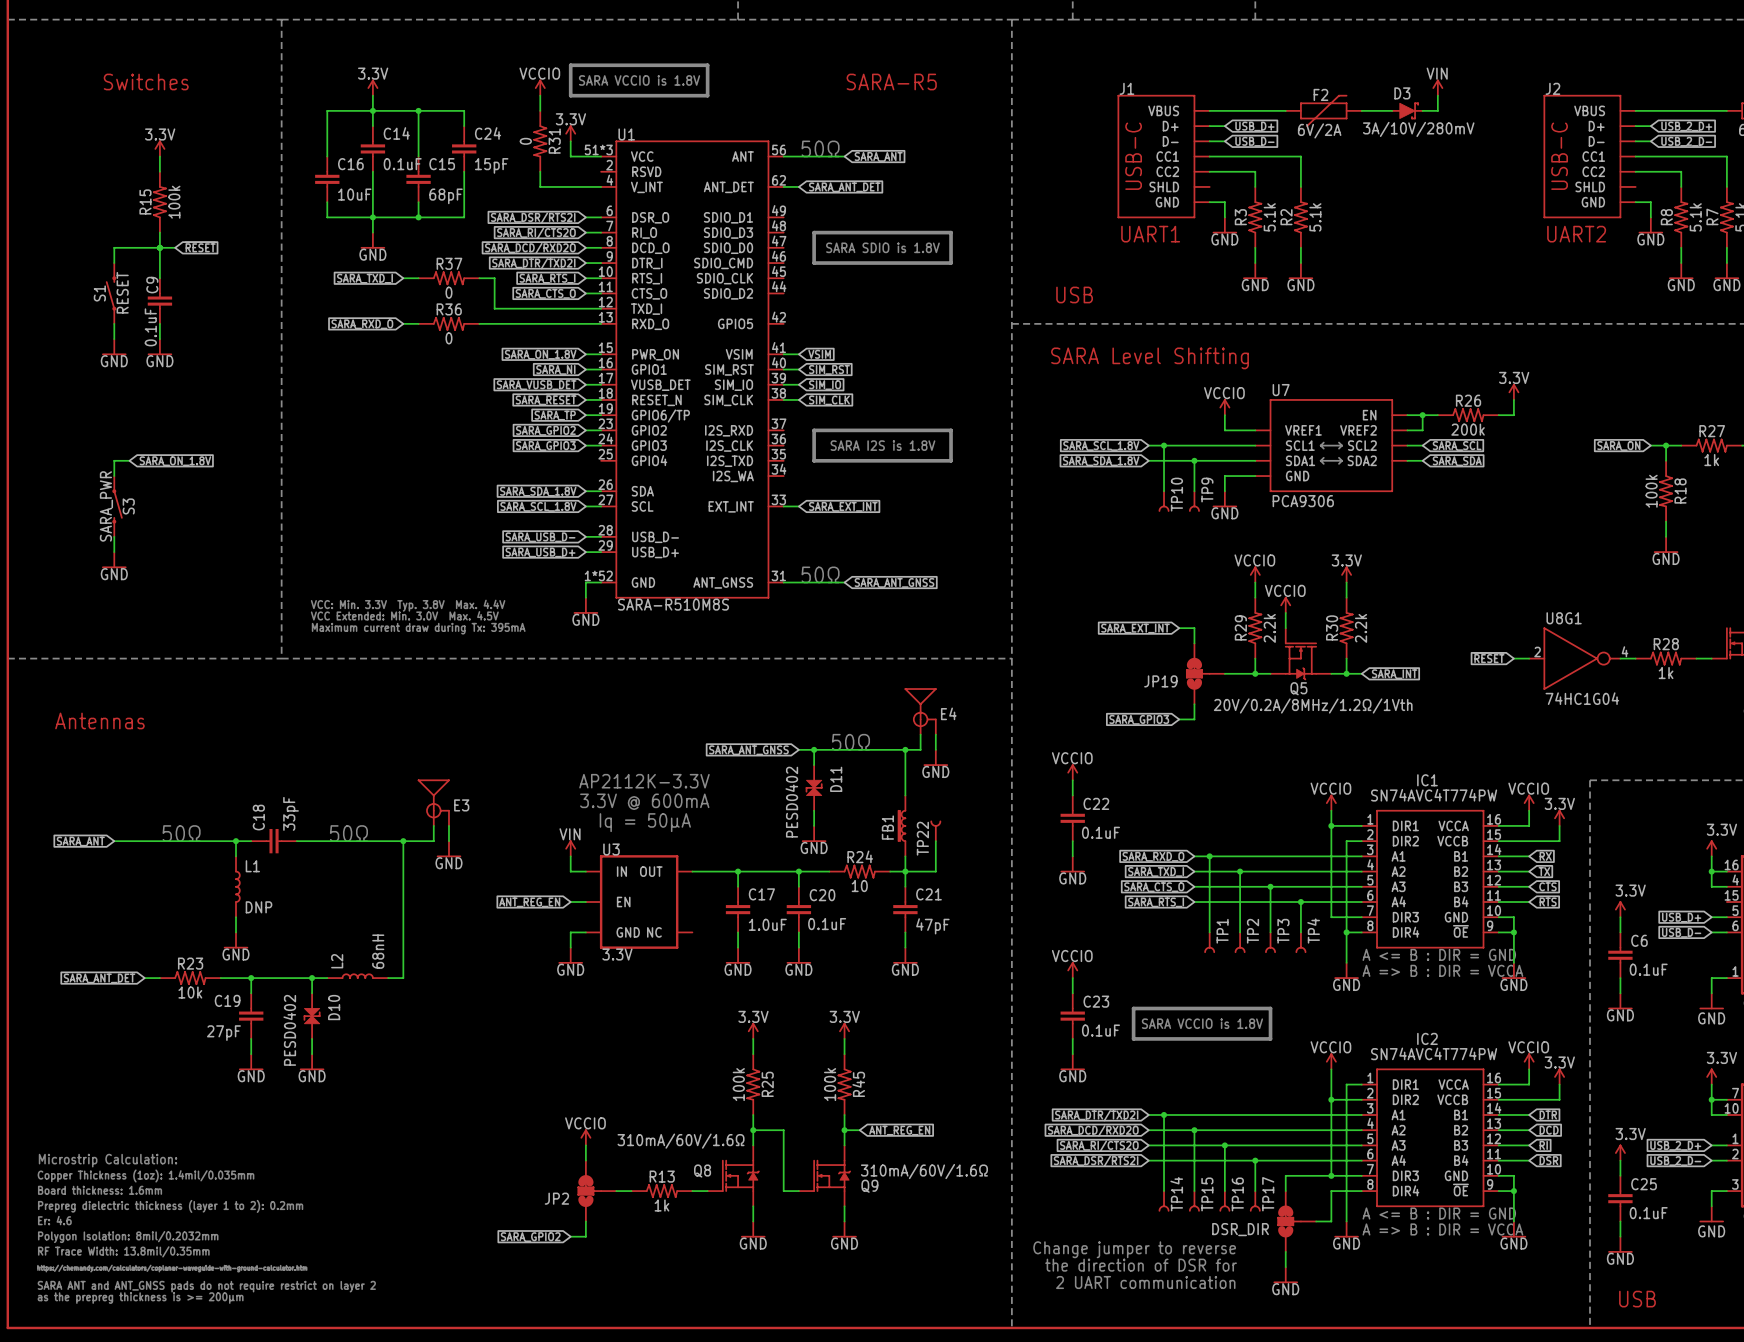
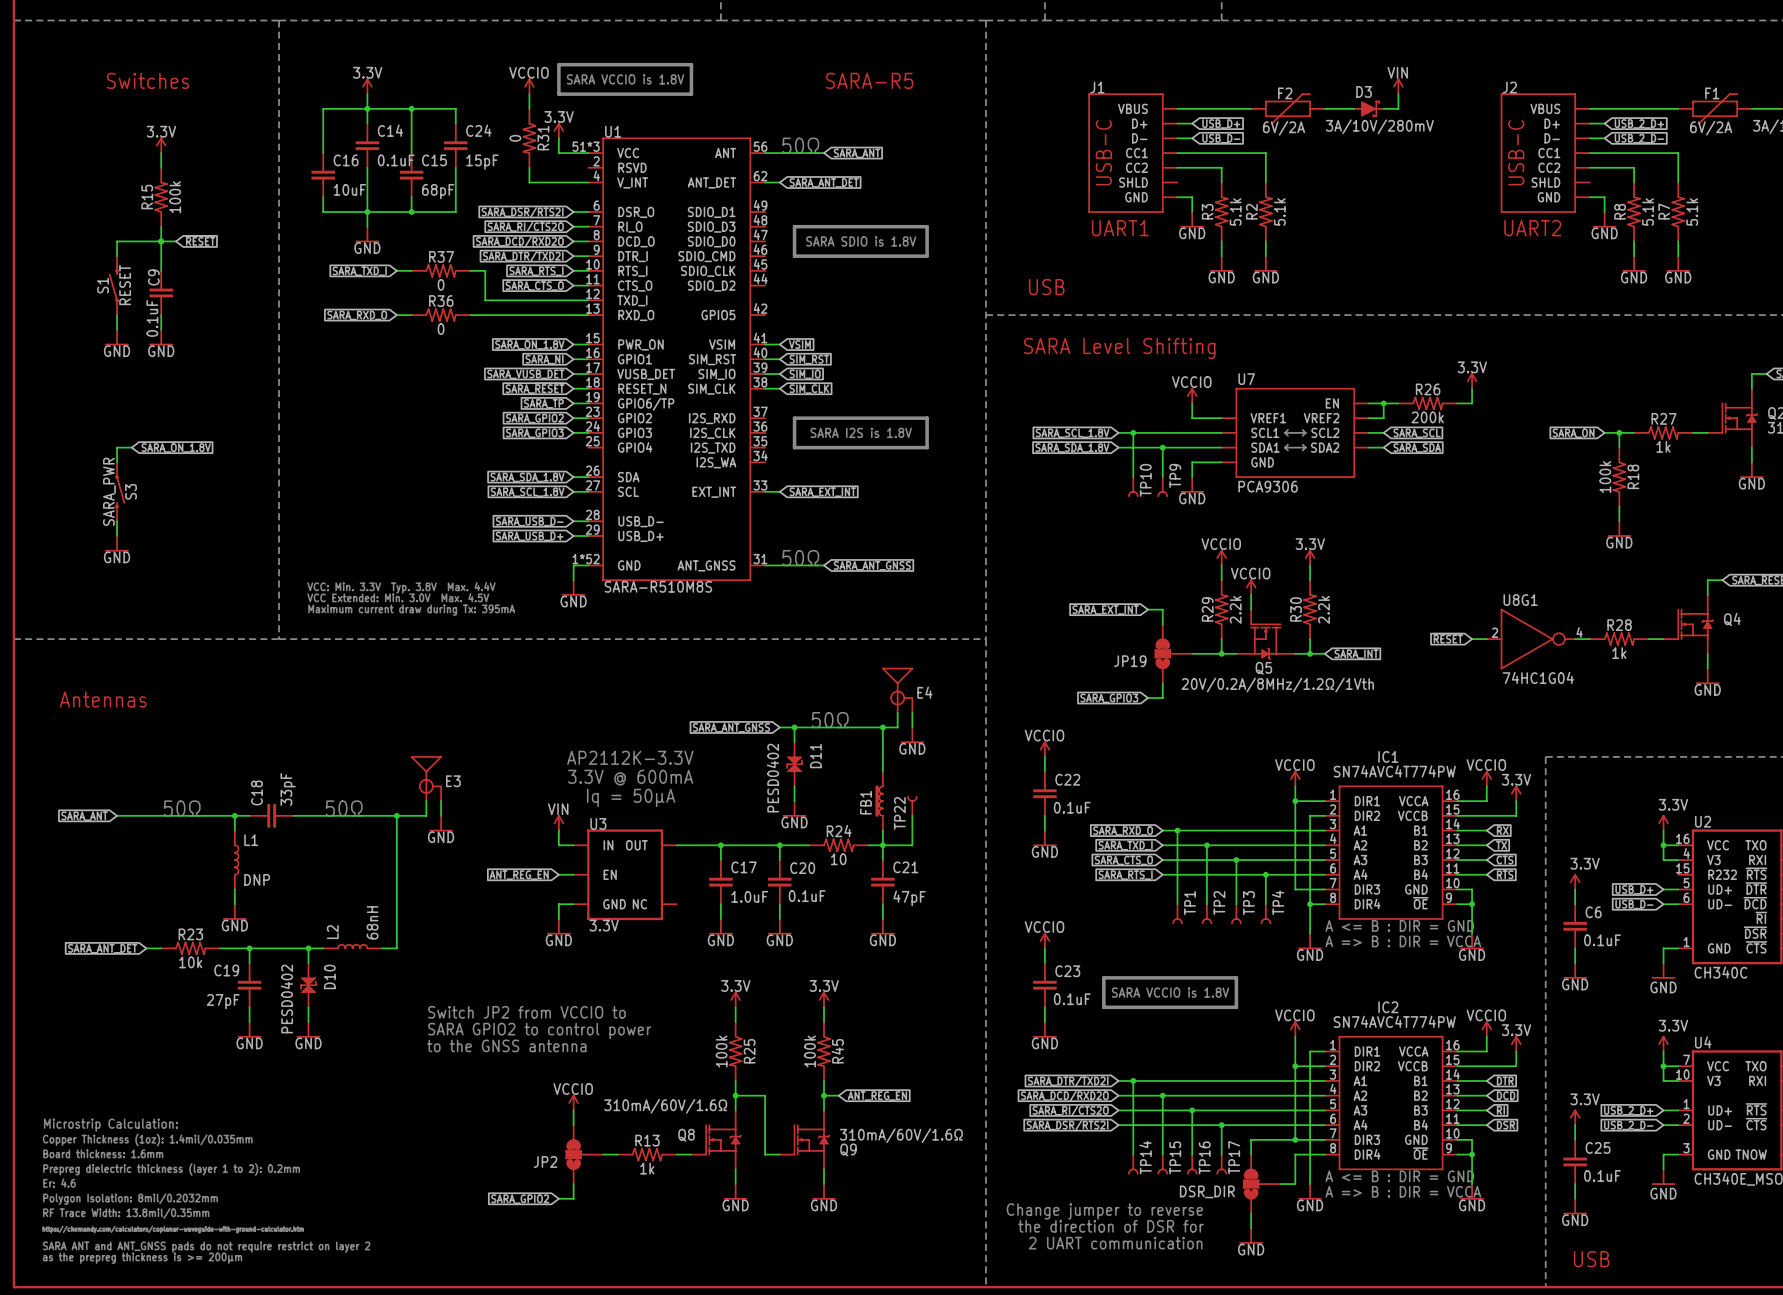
text: none -> Switch JP2 from VCCIO to (526, 1012)
text: none -> SARA GPIO2 to control power (539, 1030)
text: none -> to the GNSS antenna (506, 1045)

